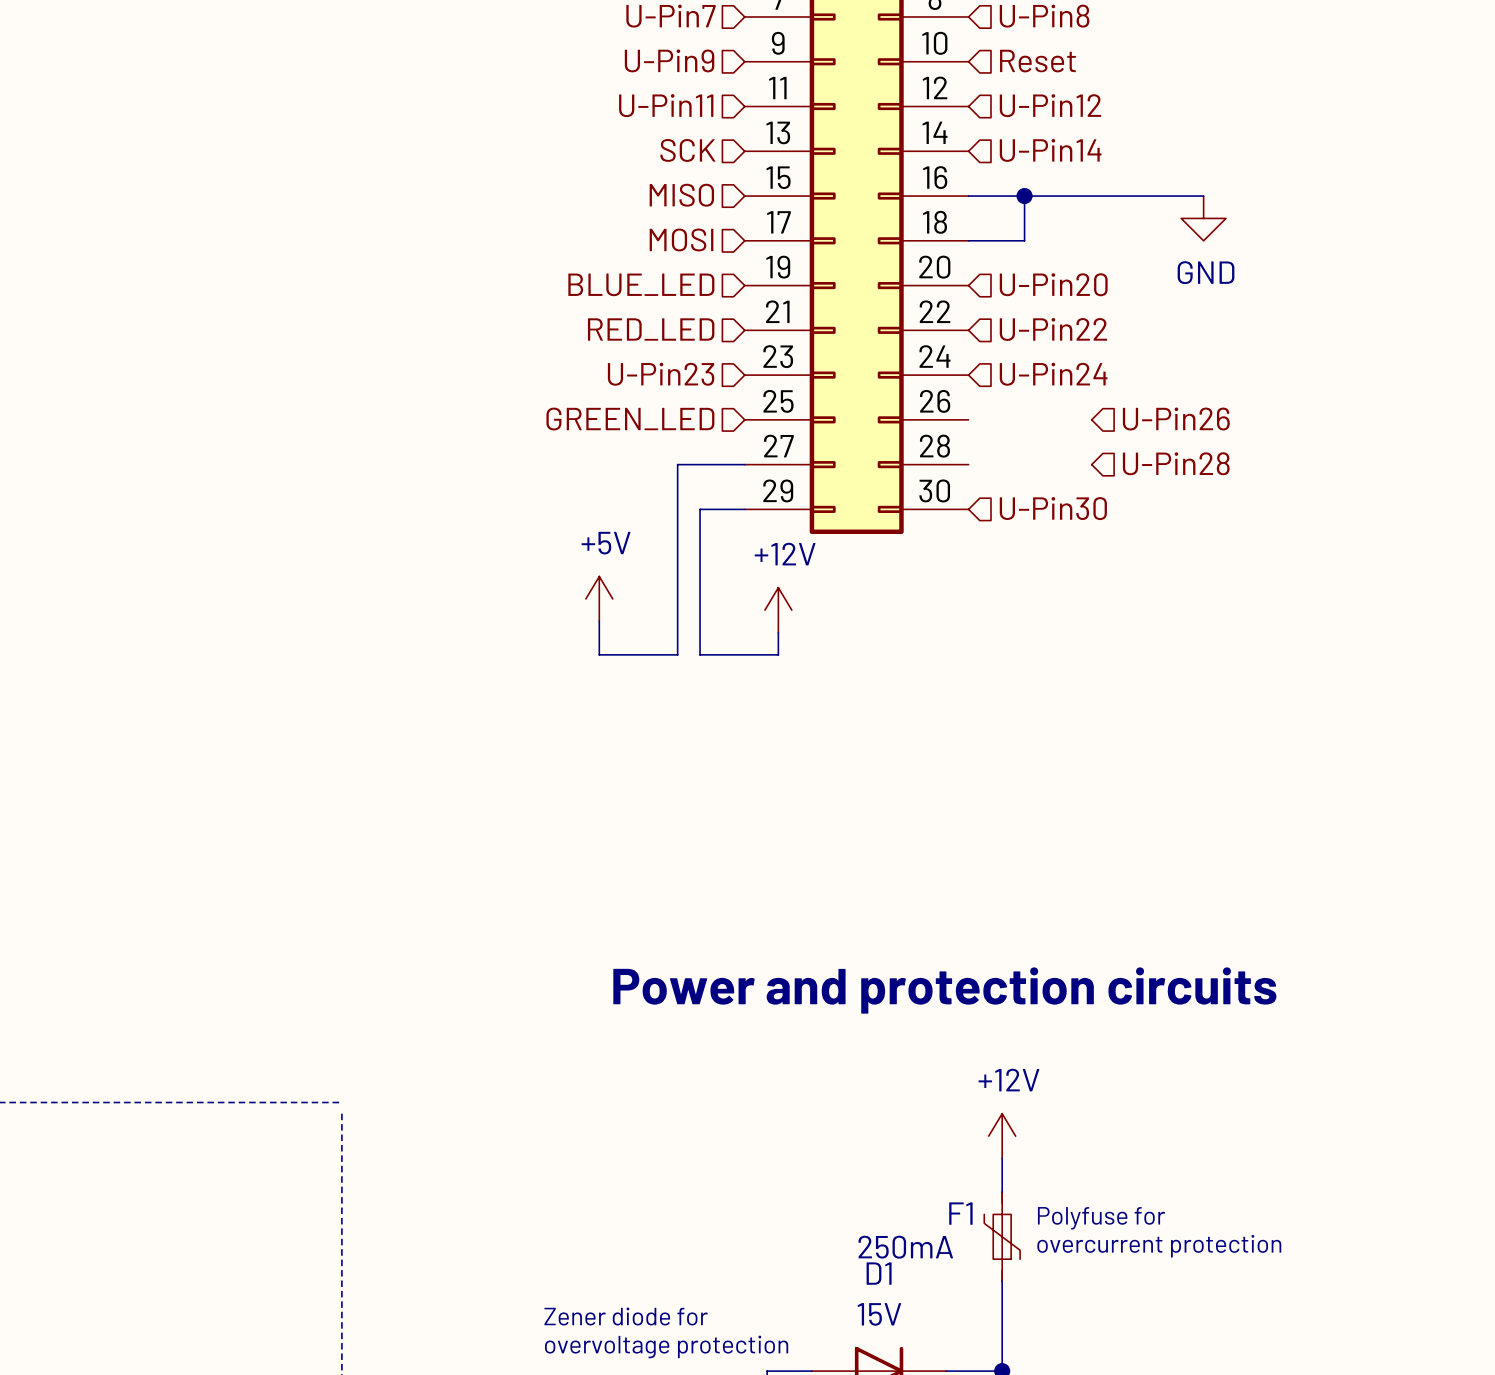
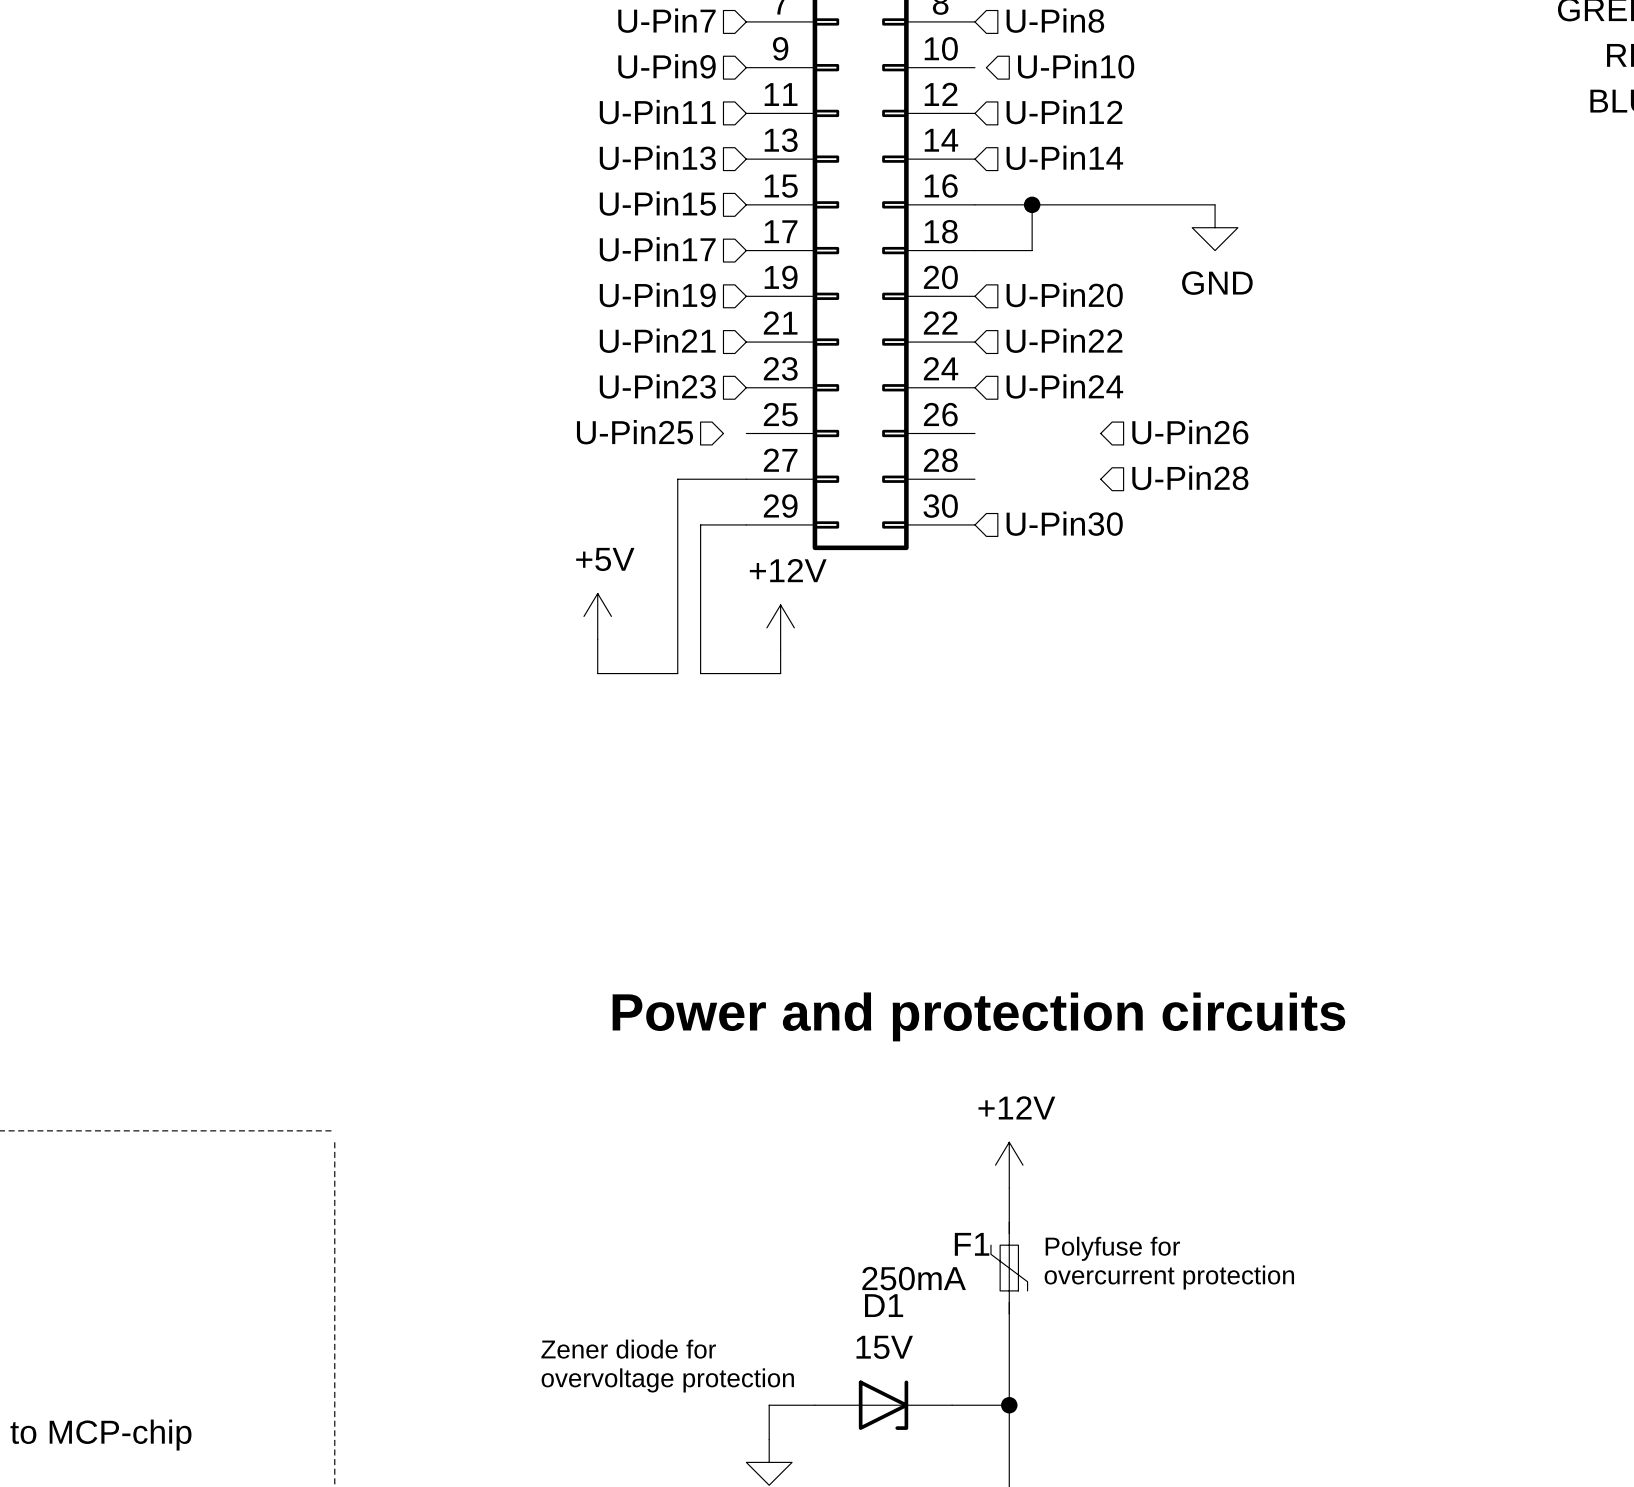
hierarchical label: Reset (1037, 61) -> U-Pin10 (1076, 66)
hierarchical label: SCK (687, 150) -> U-Pin13 (657, 157)
hierarchical label: MISO (681, 195) -> U-Pin15 (657, 203)
hierarchical label: MOSI (681, 239) -> U-Pin17 (657, 249)
hierarchical label: BLUE_LED (641, 284) -> U-Pin19 (657, 295)
hierarchical label: RED_LED (651, 329) -> U-Pin21 (657, 340)
hierarchical label: GREEN_LED (630, 419) -> none
hierarchical label: none -> U-Pin25 (634, 432)

